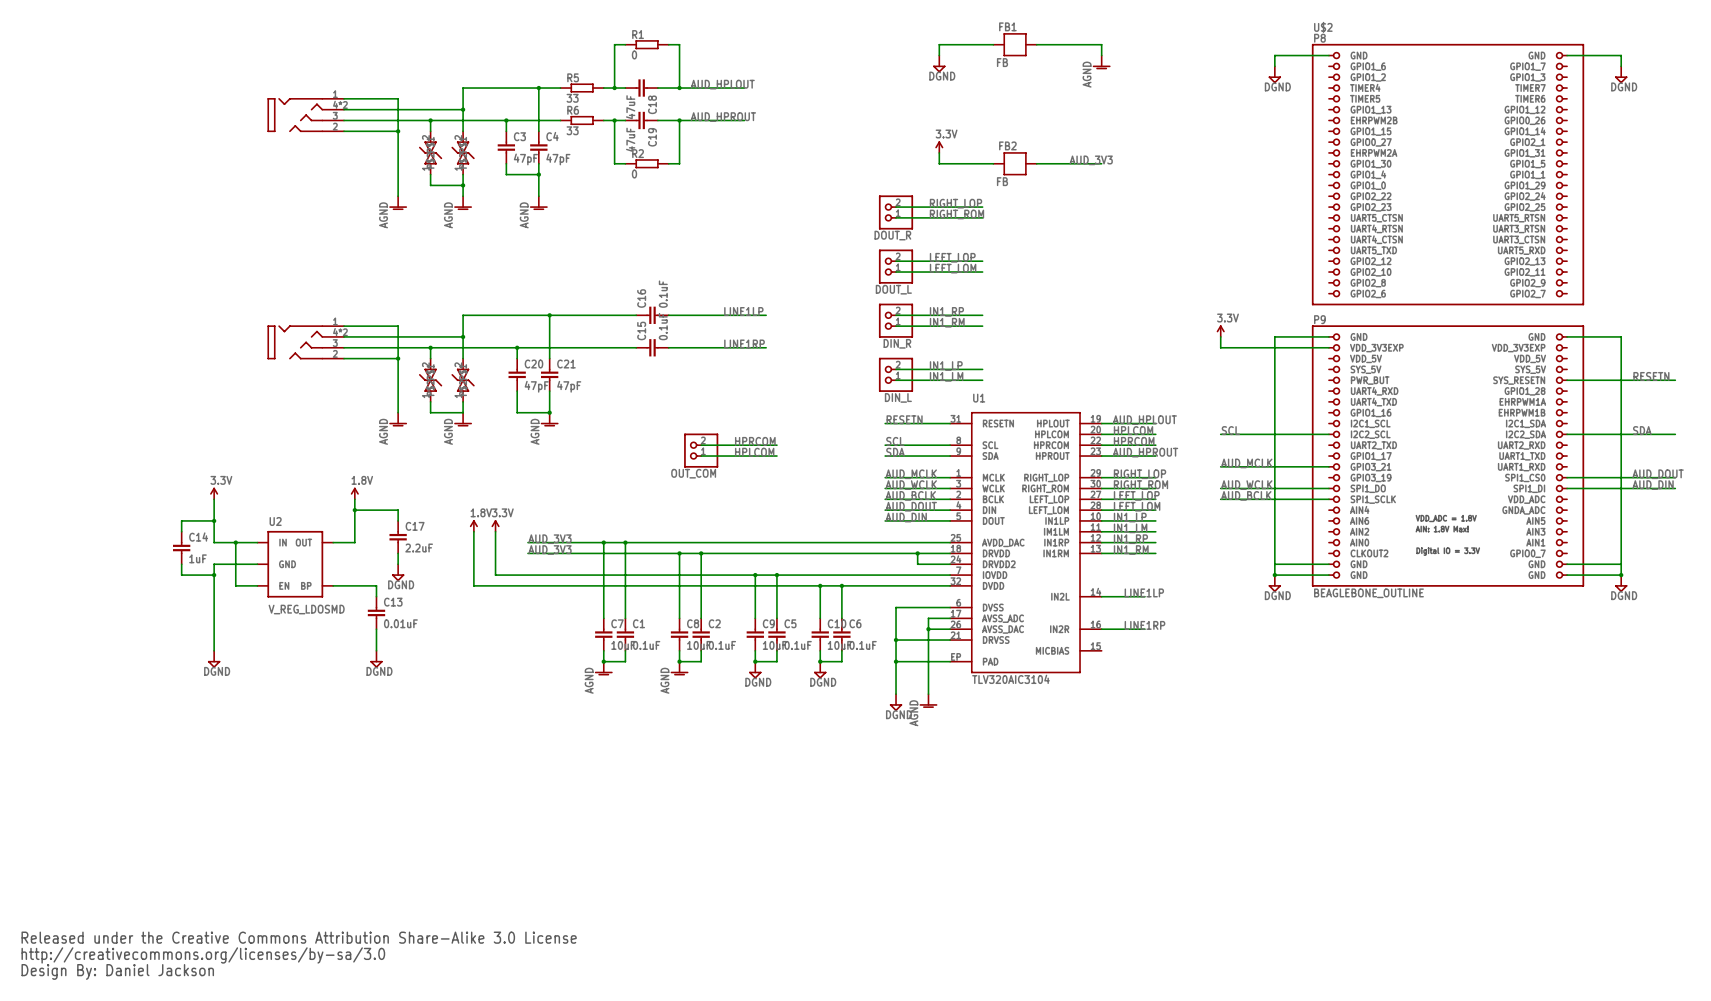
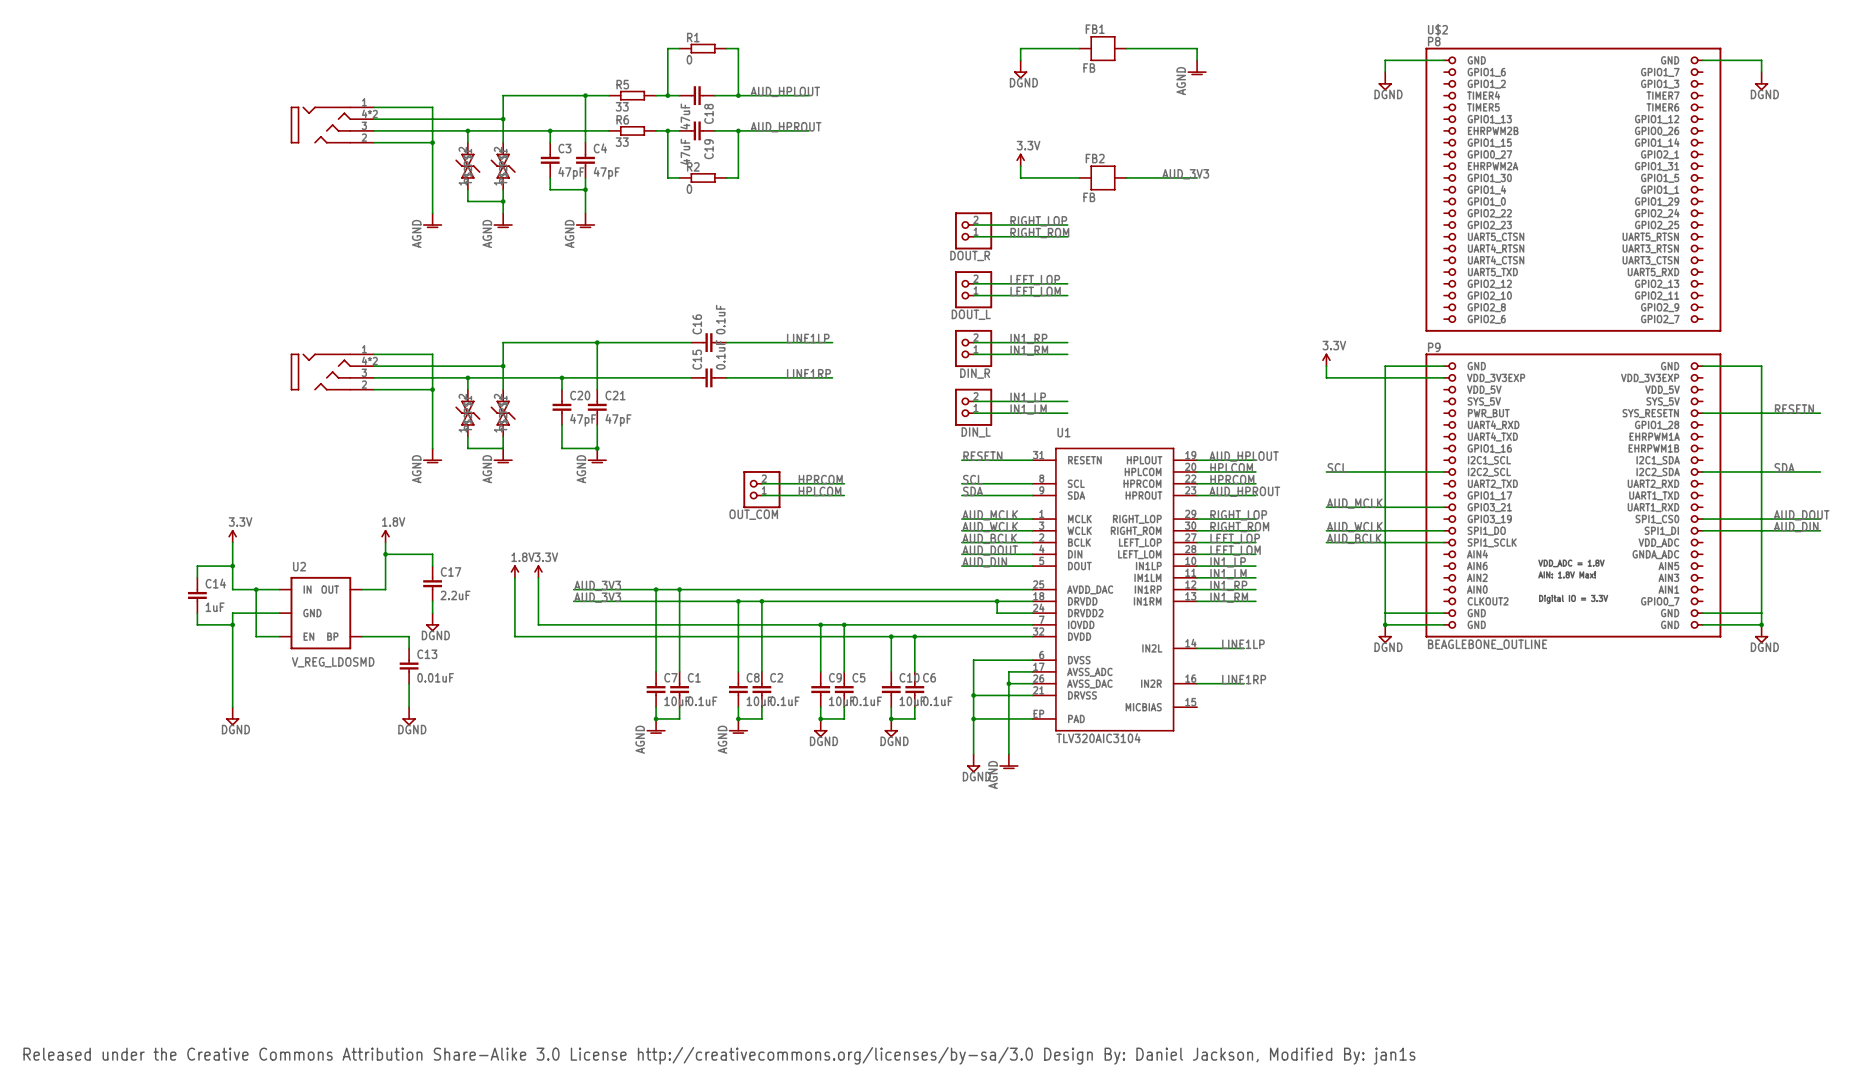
text: Released under the Creative Commons Attribution Share-Alike 3.0 License (299, 937) -> none
text: http://creativecommons.org/licenses/by-sa/3.0 (203, 955) -> none
text: Design By: Daniel Jackson (117, 971) -> Released under the Creative Commons Attribution Share-Alike 3.0 License http://creativecommons.org/licenses/by-sa/3.0 Design By: Daniel Jackson, Modified By: jan1s (719, 1055)

